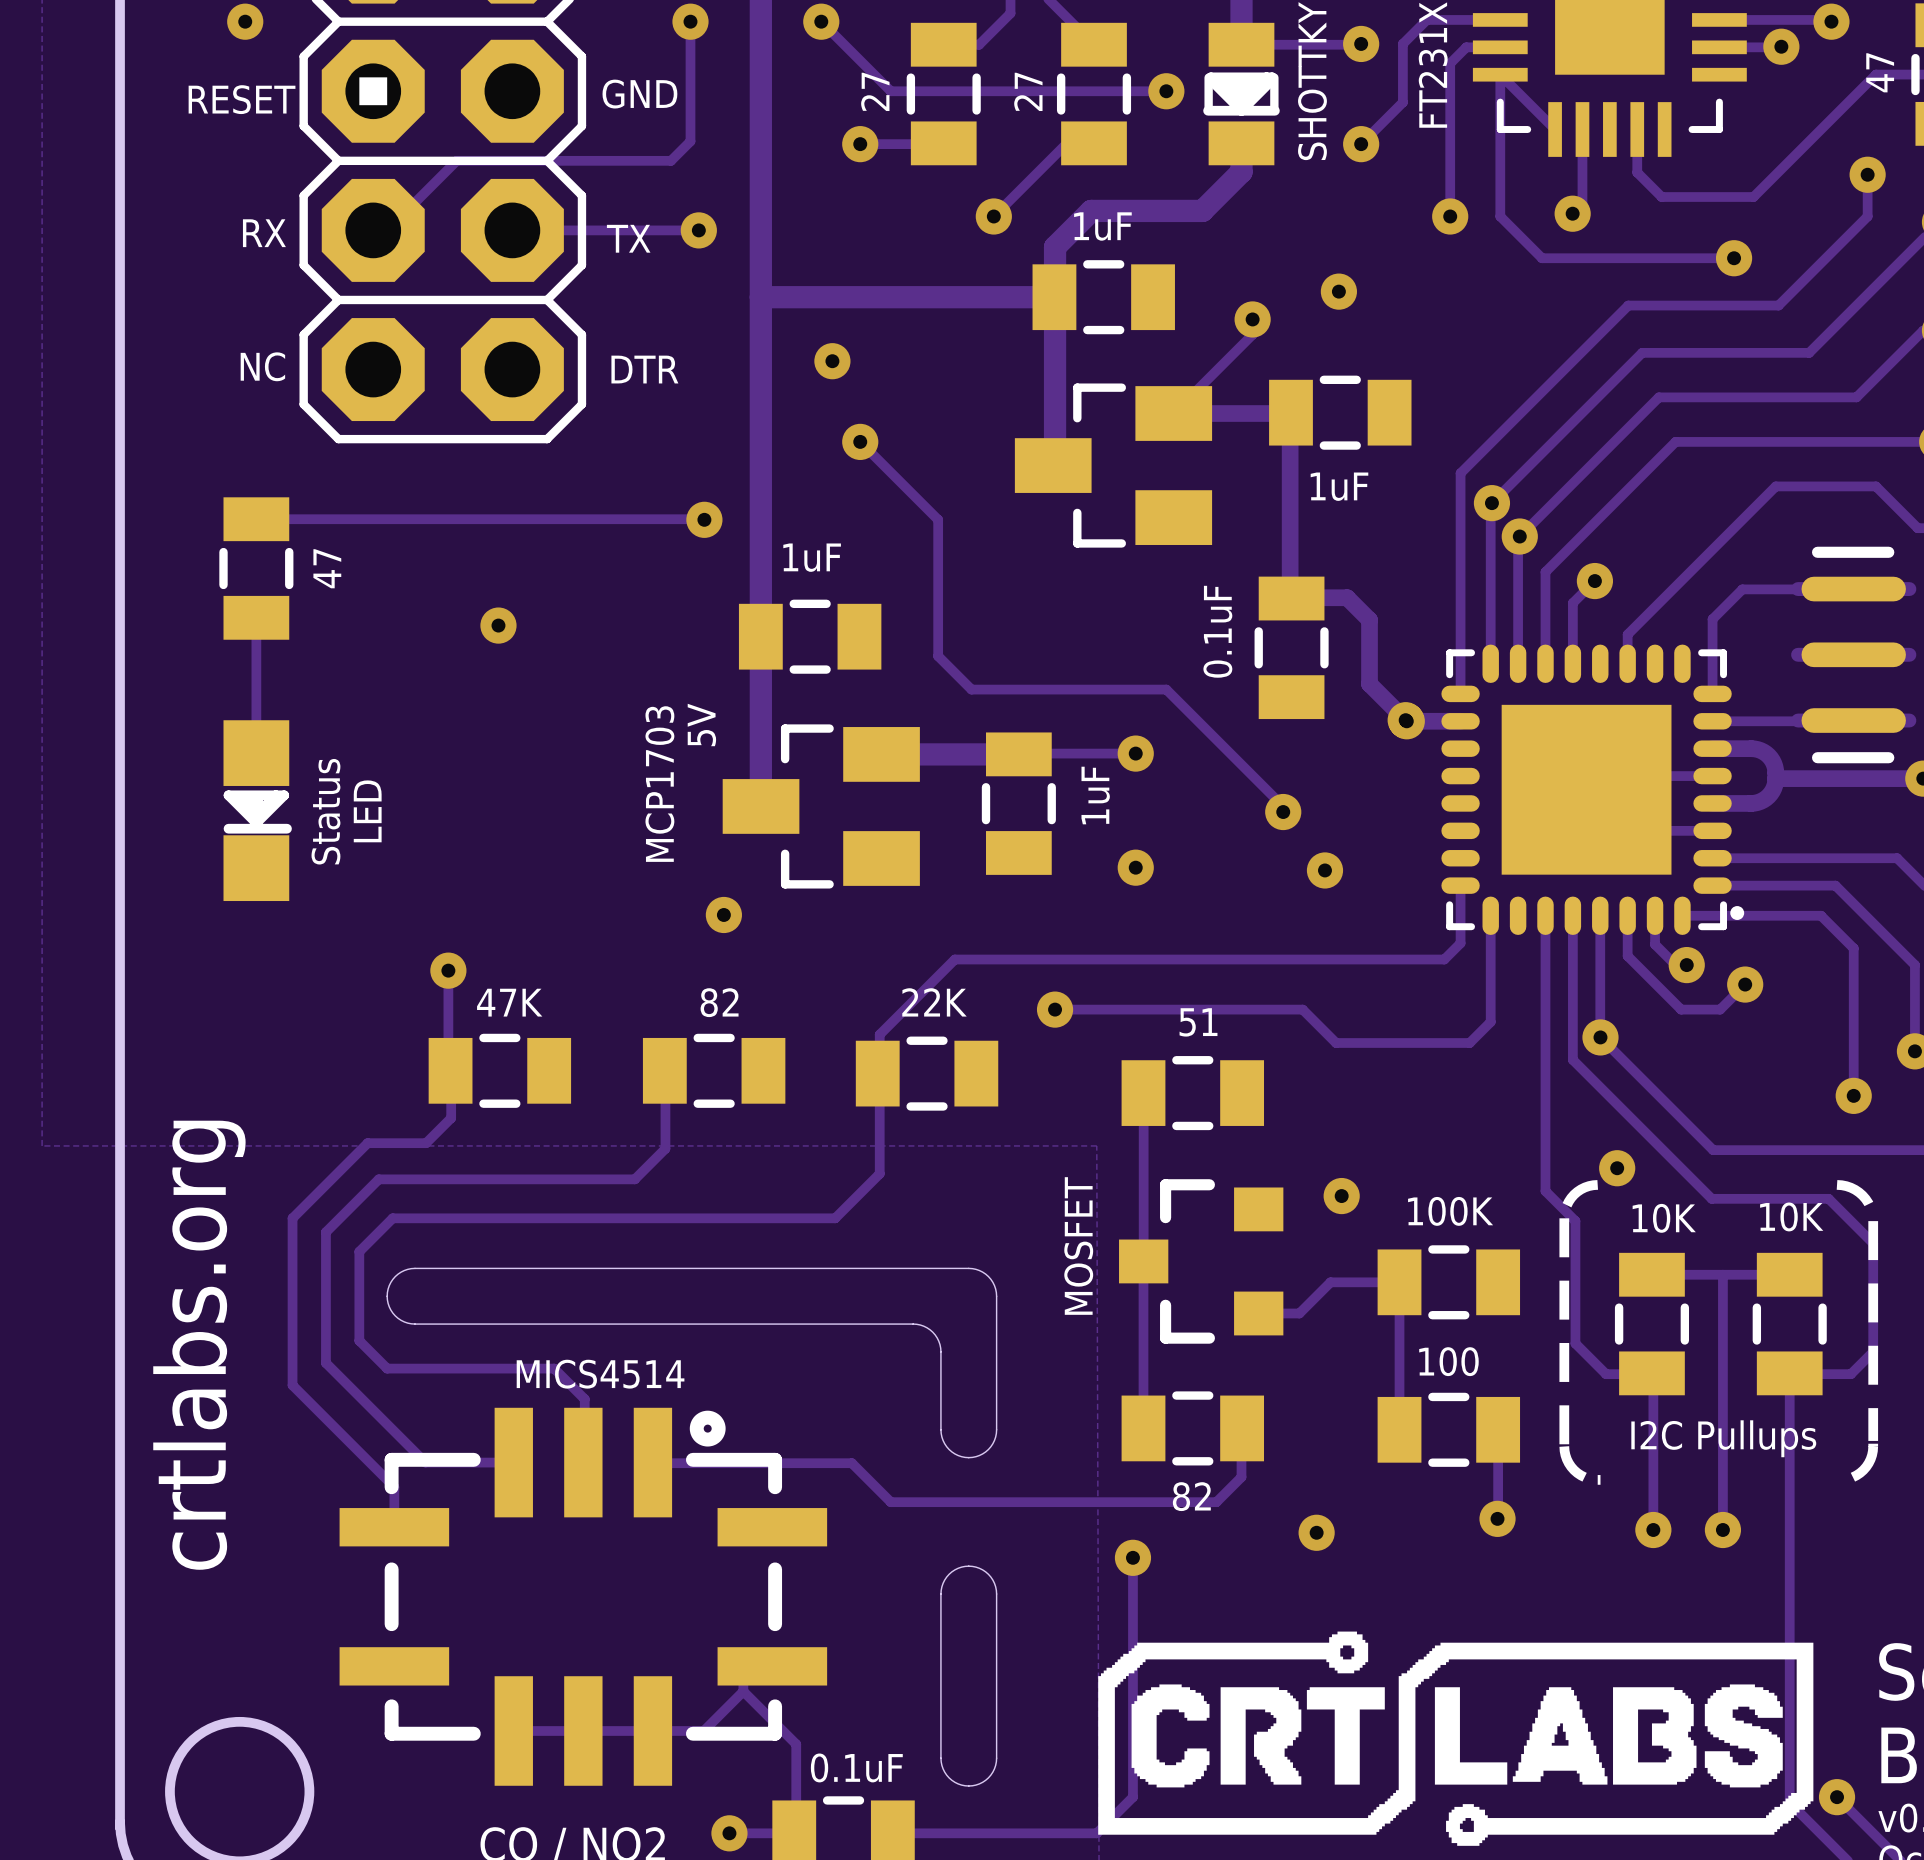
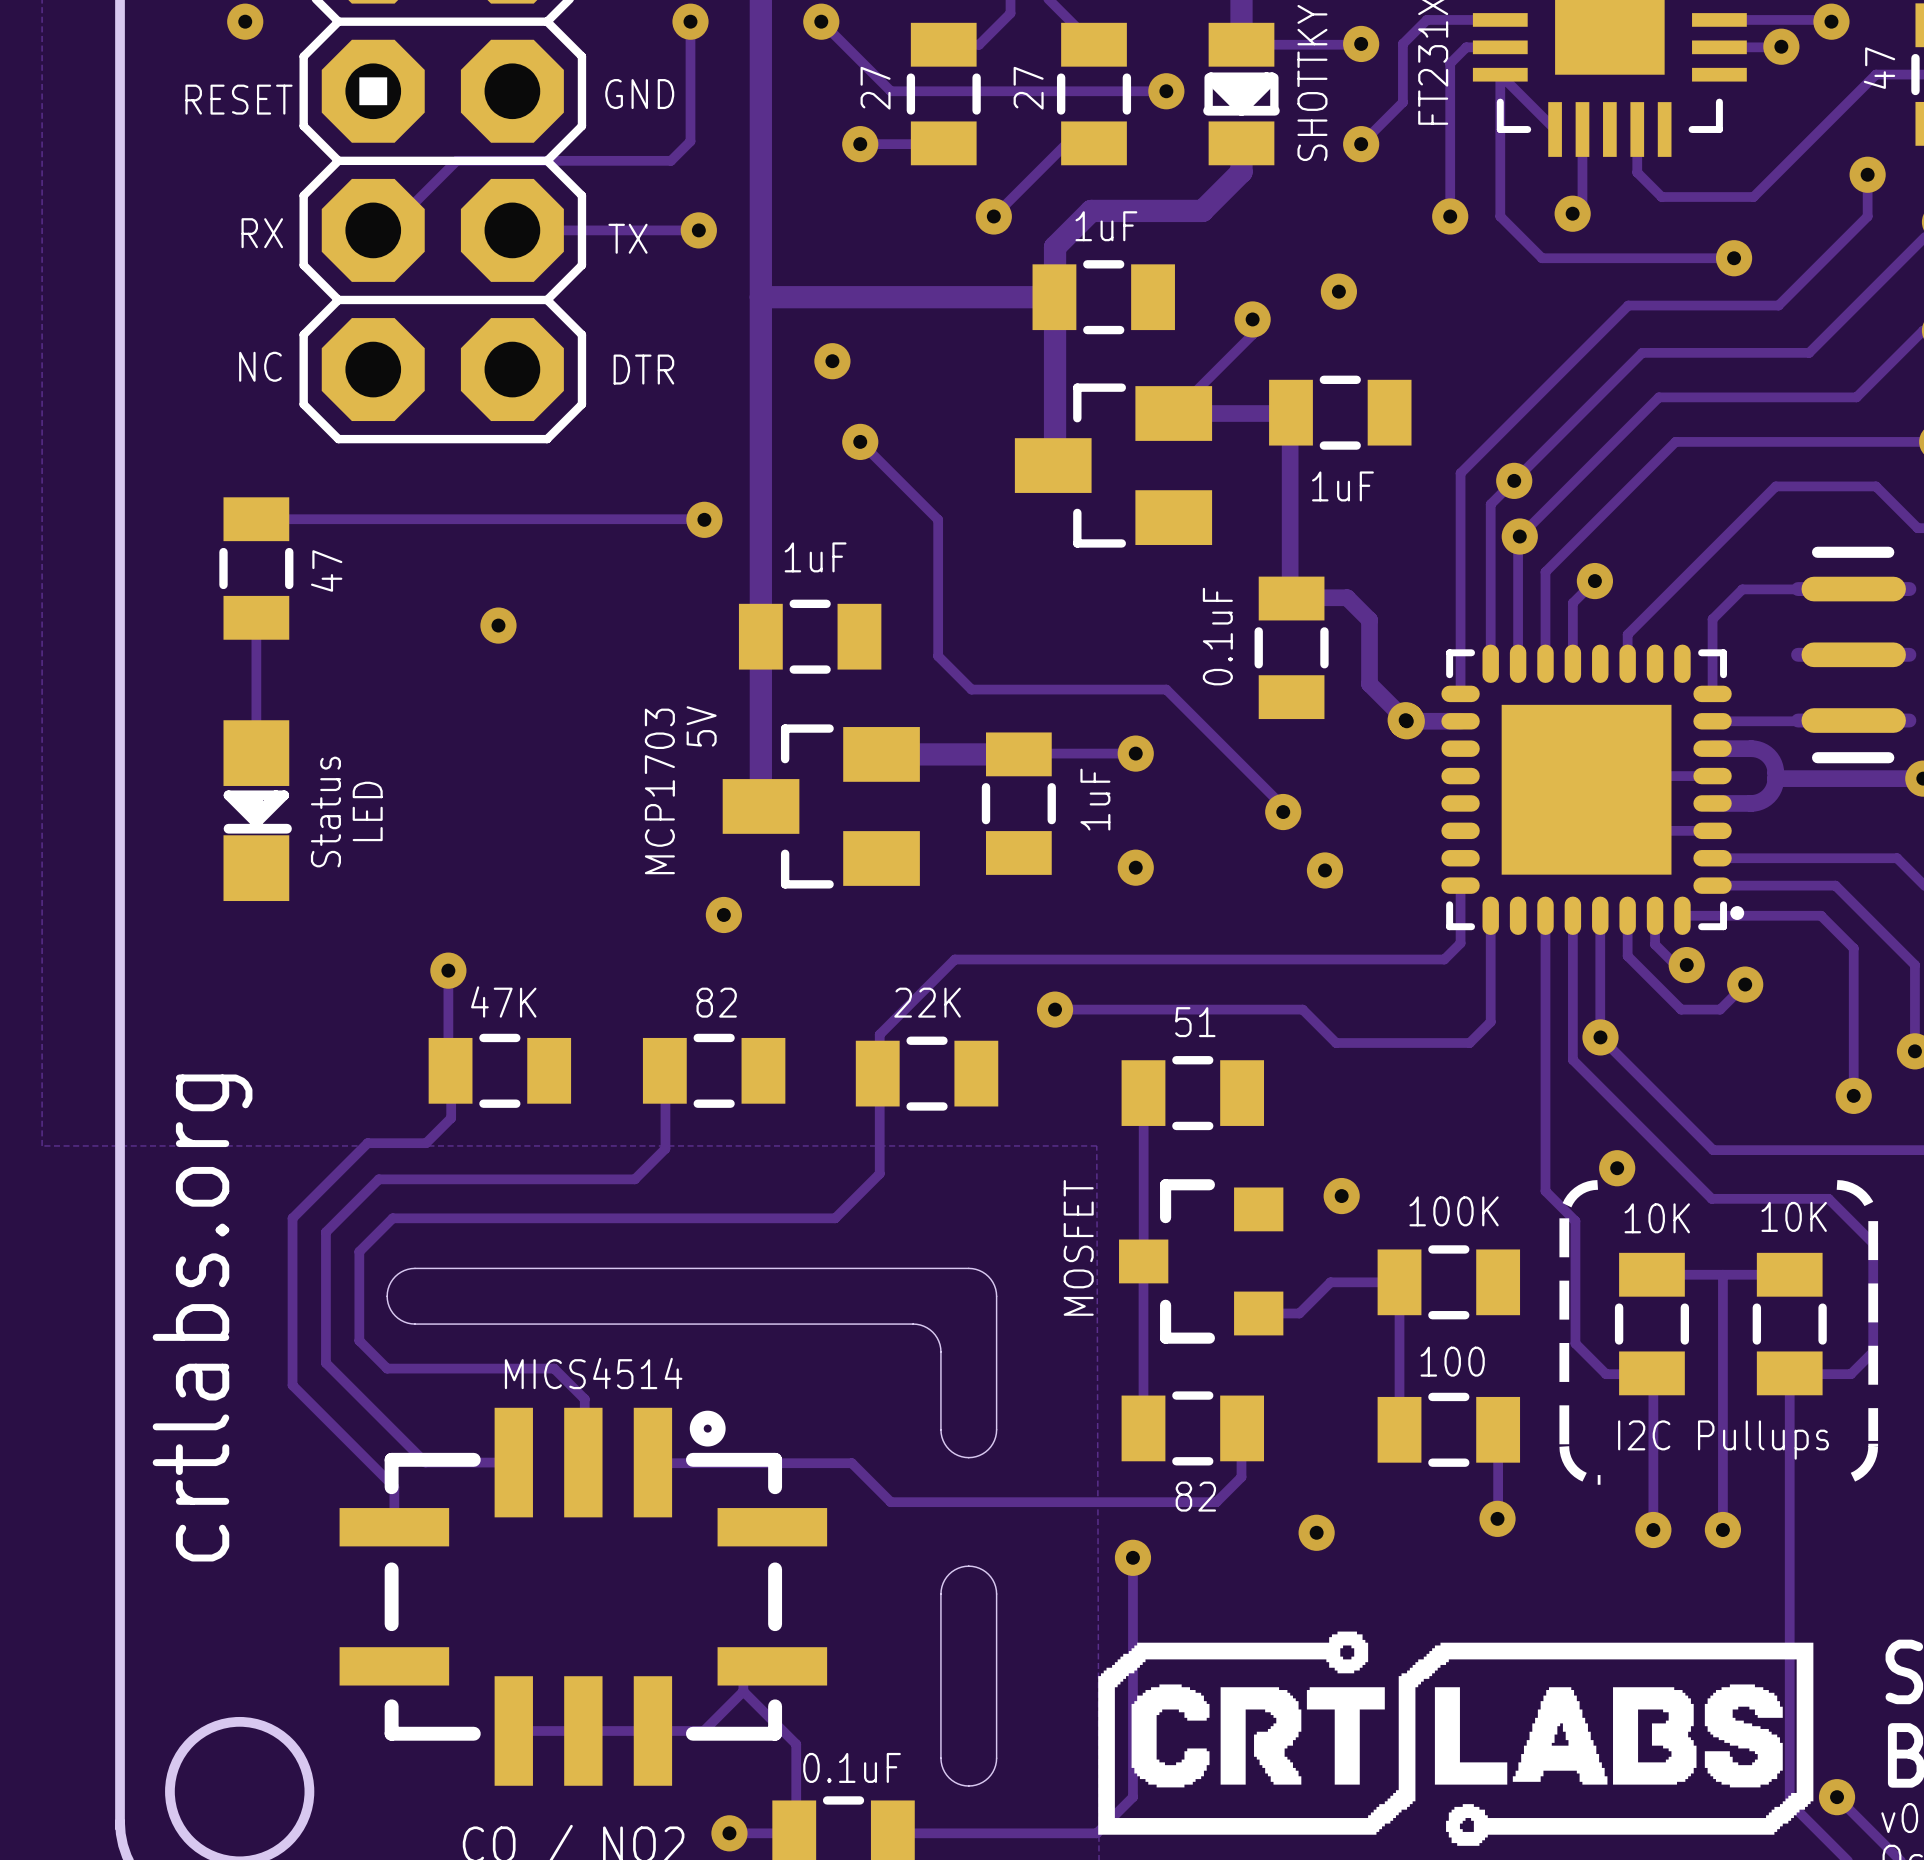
via position: (1491, 503) -> (1514, 480)

